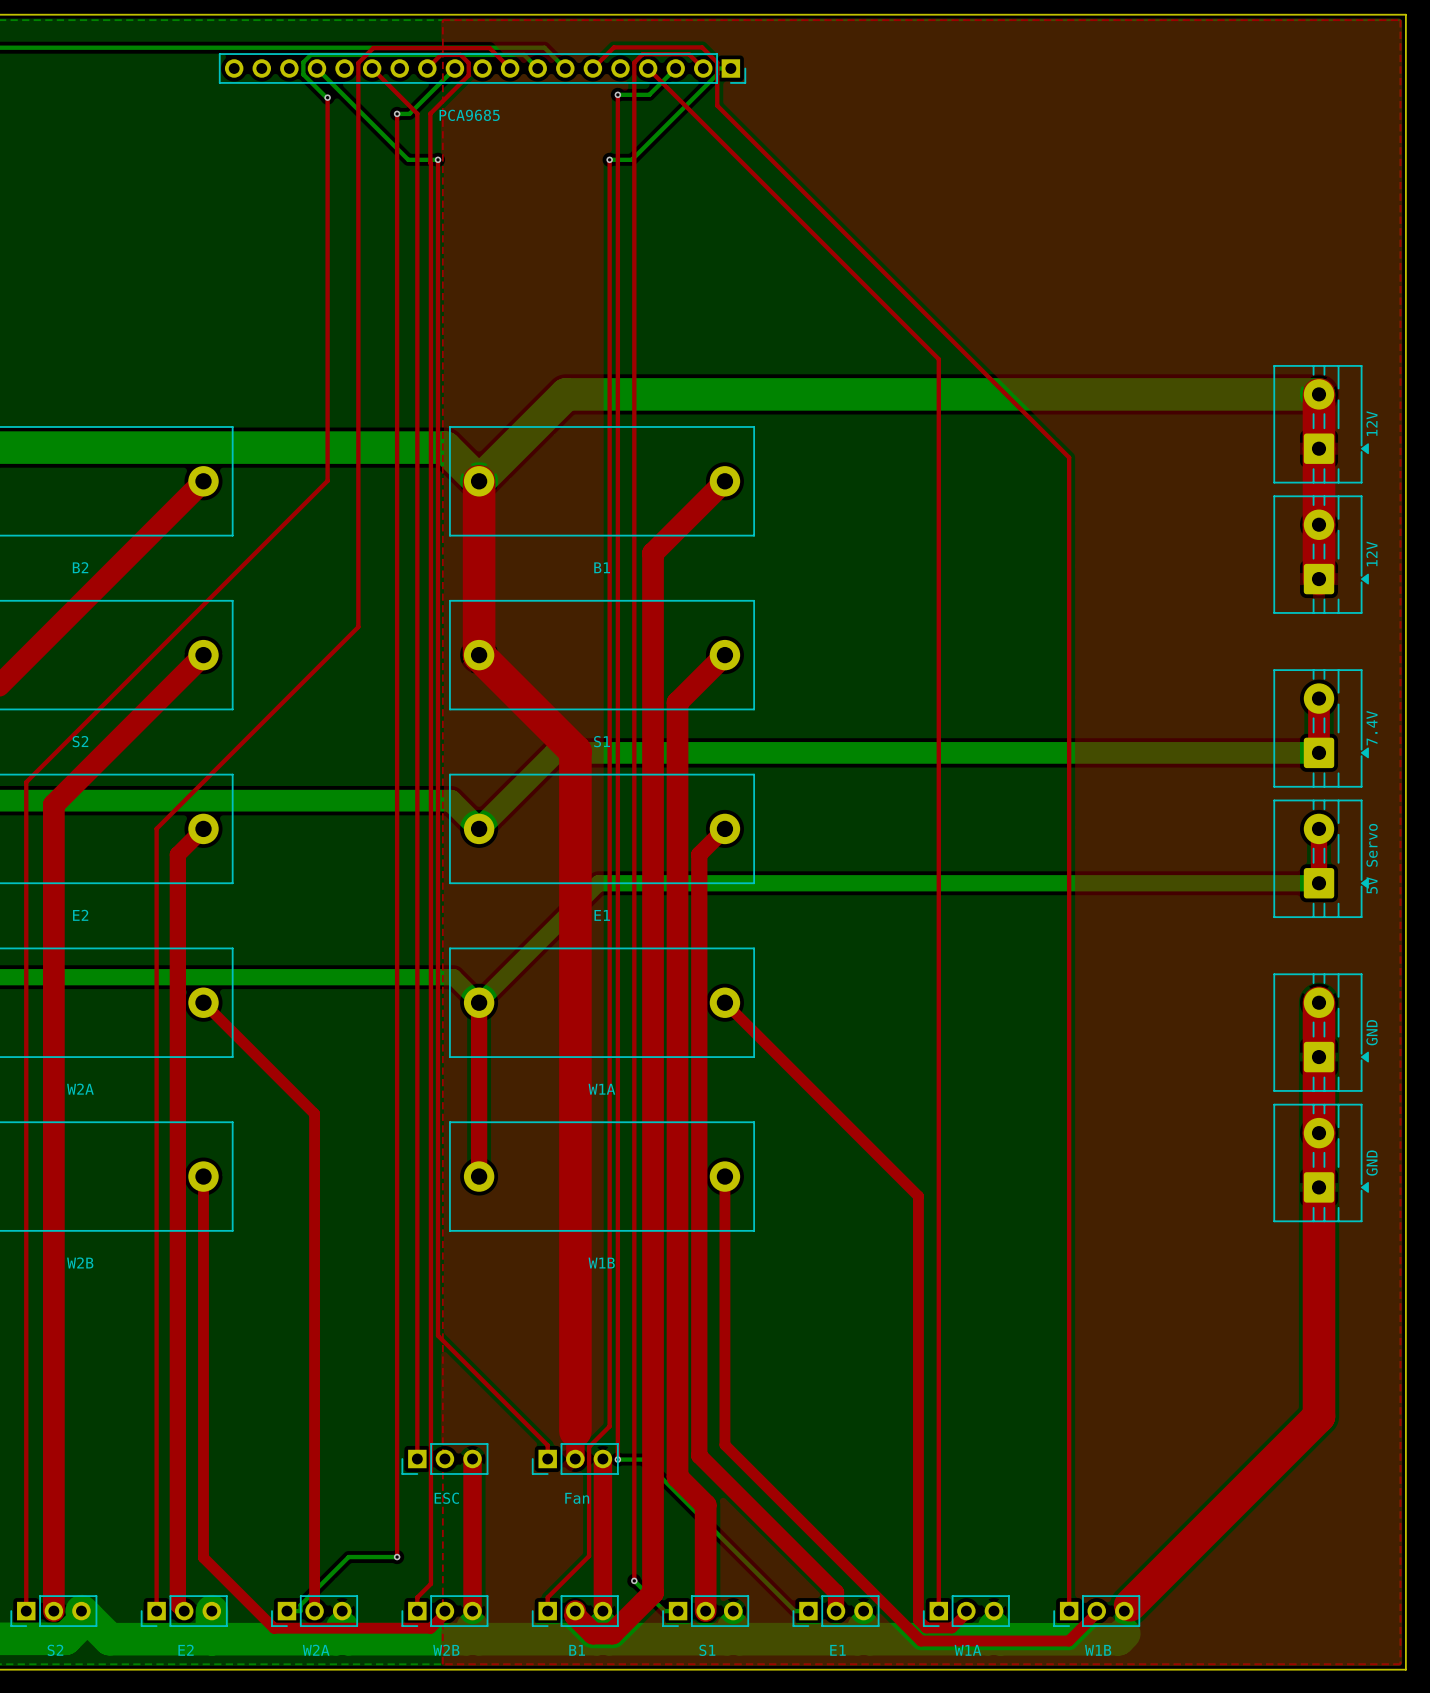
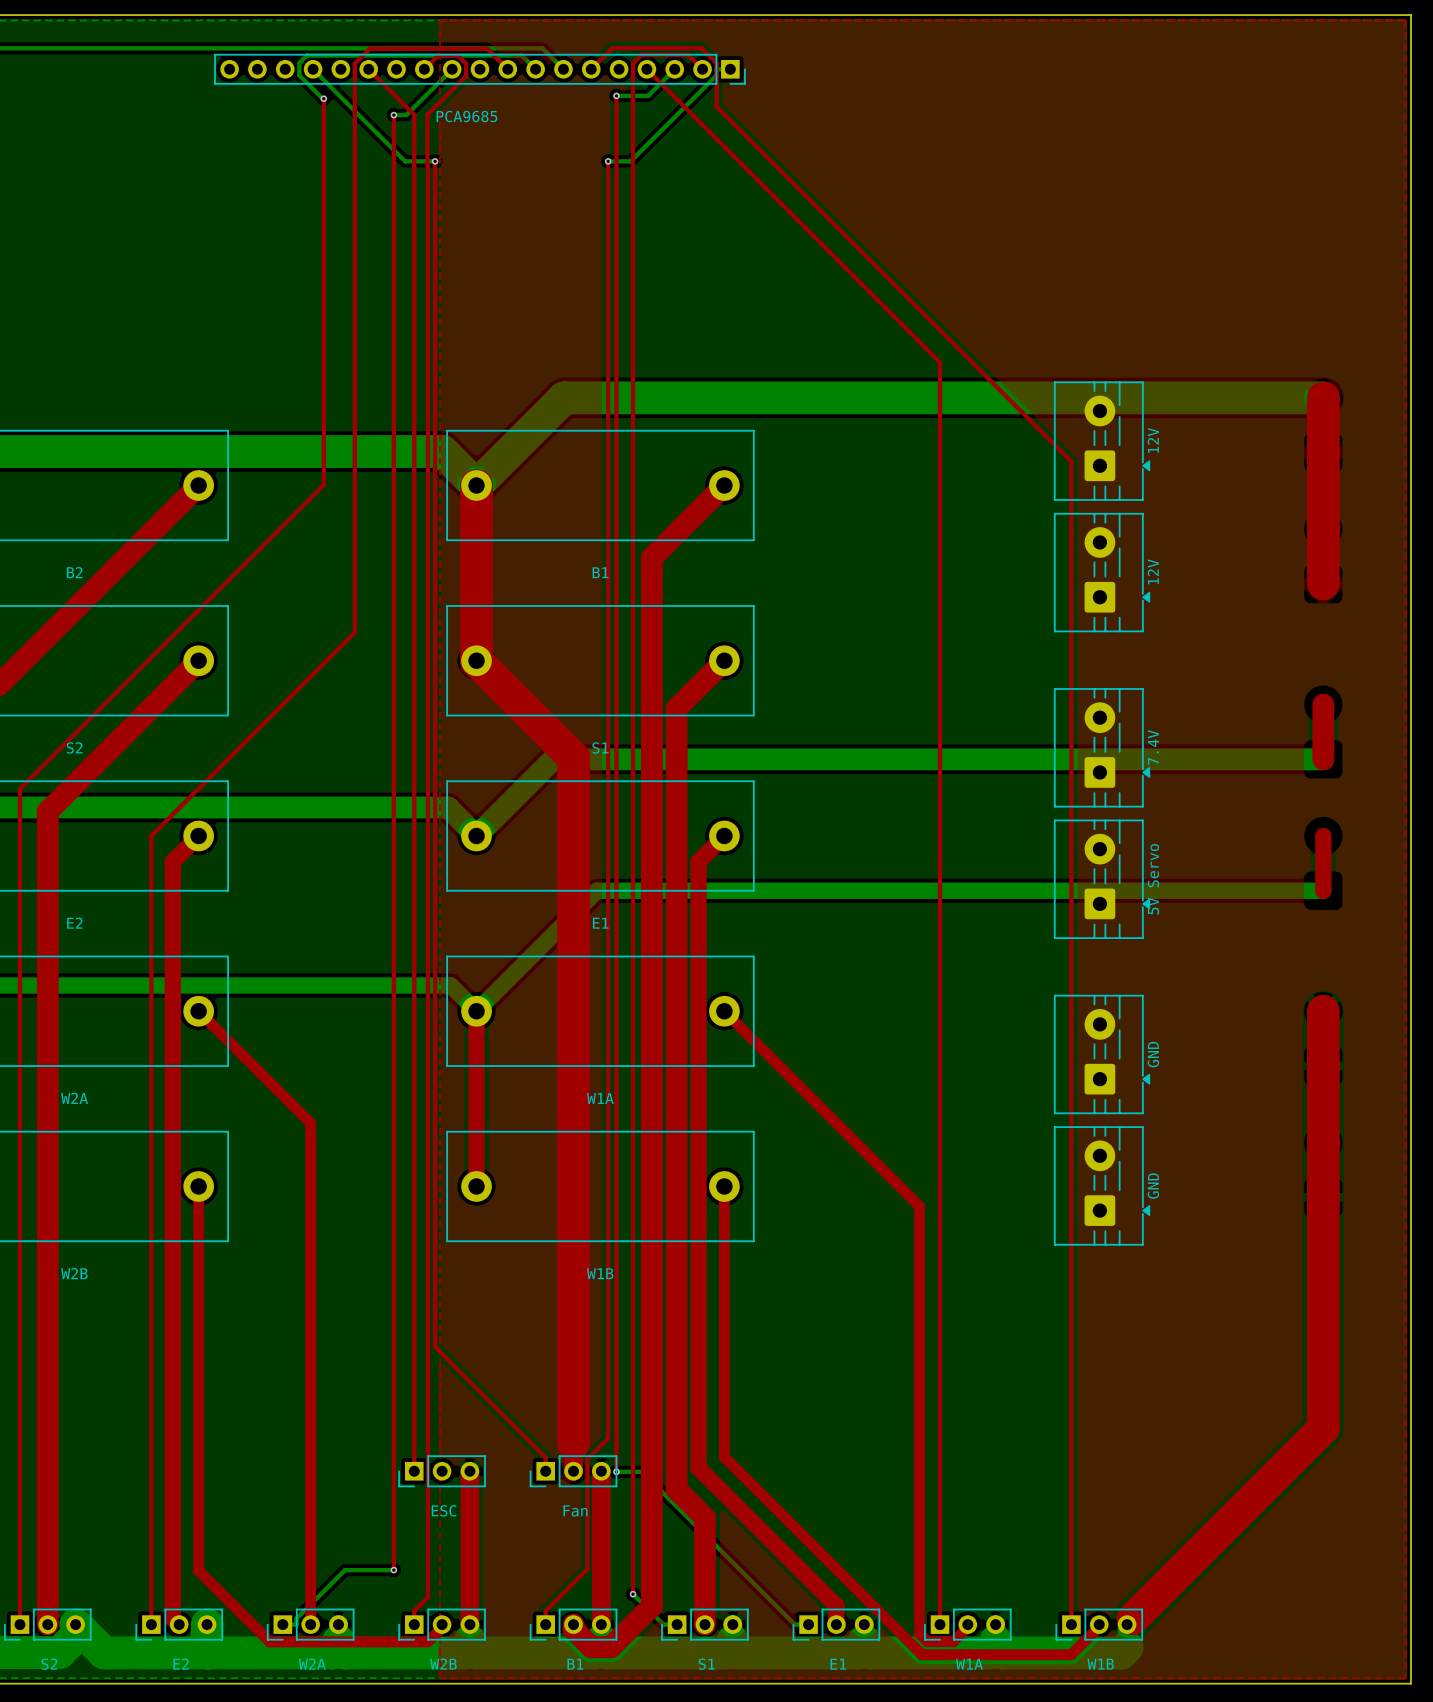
part: 12V (1321, 424) -> none
part: none -> 12V (1102, 441)
part: 12V (1321, 554) -> none
part: none -> 12V (1102, 572)
part position: (1321, 728) -> (1102, 747)
part position: (1321, 858) -> (1102, 879)
part: GND (1321, 1032) -> none
part: none -> GND (1102, 1054)
part: GND (1321, 1162) -> none
part: none -> GND (1102, 1185)

